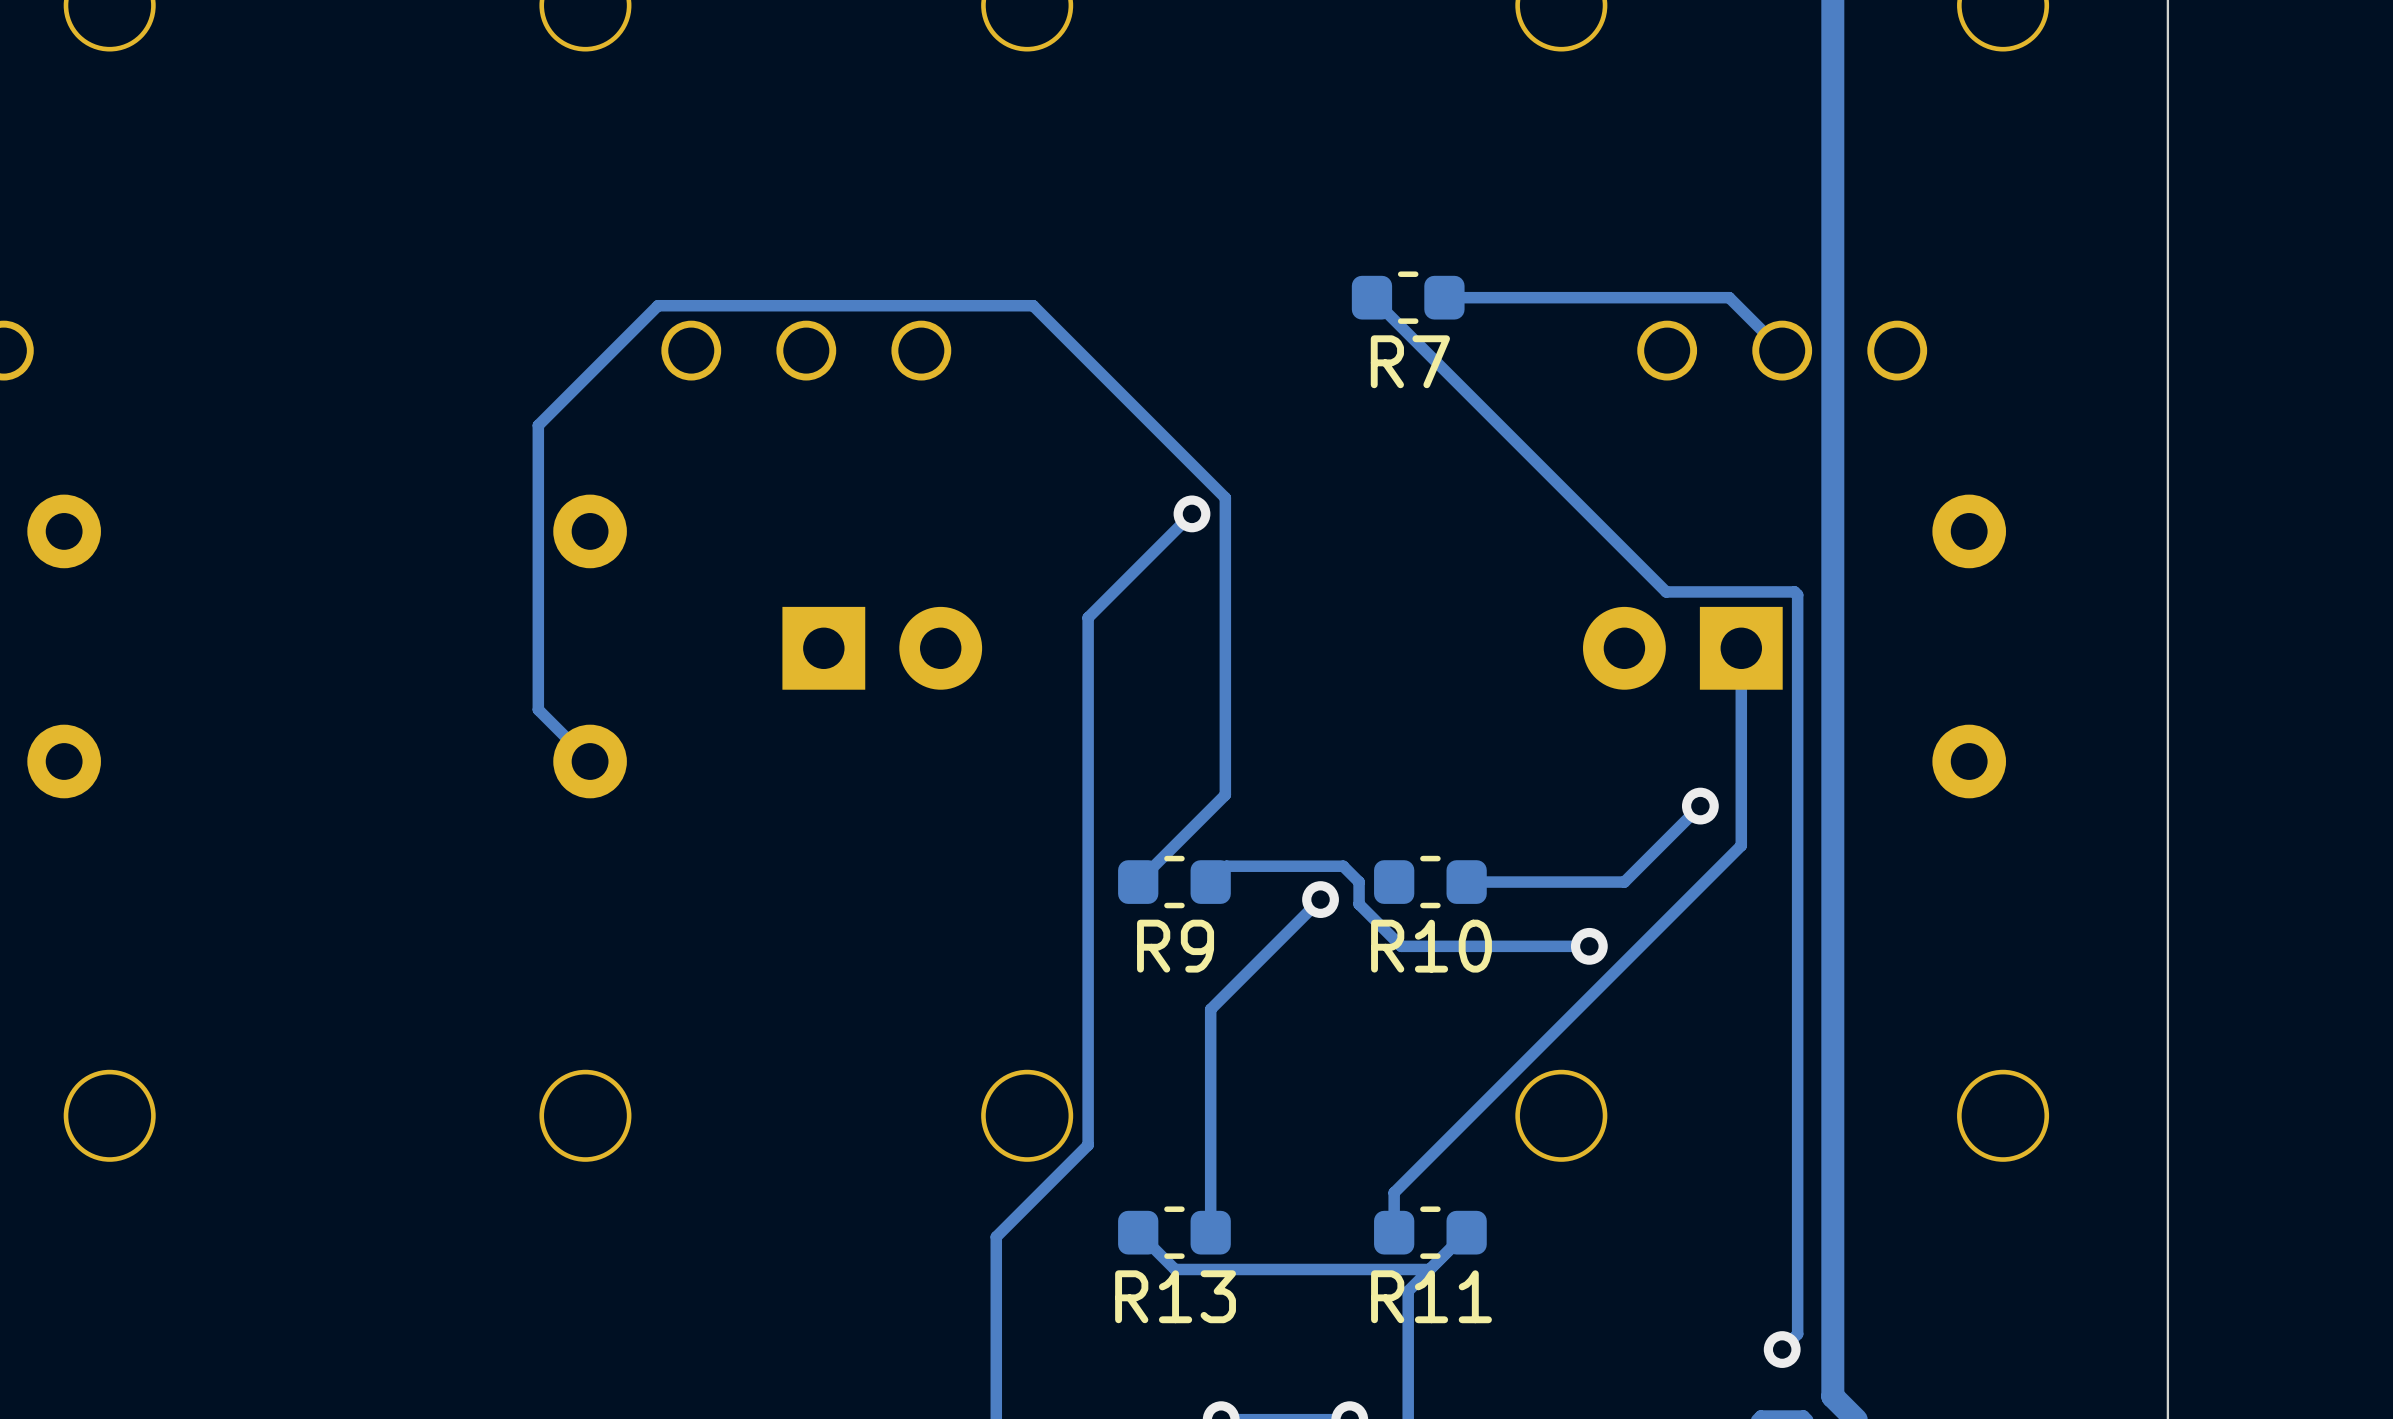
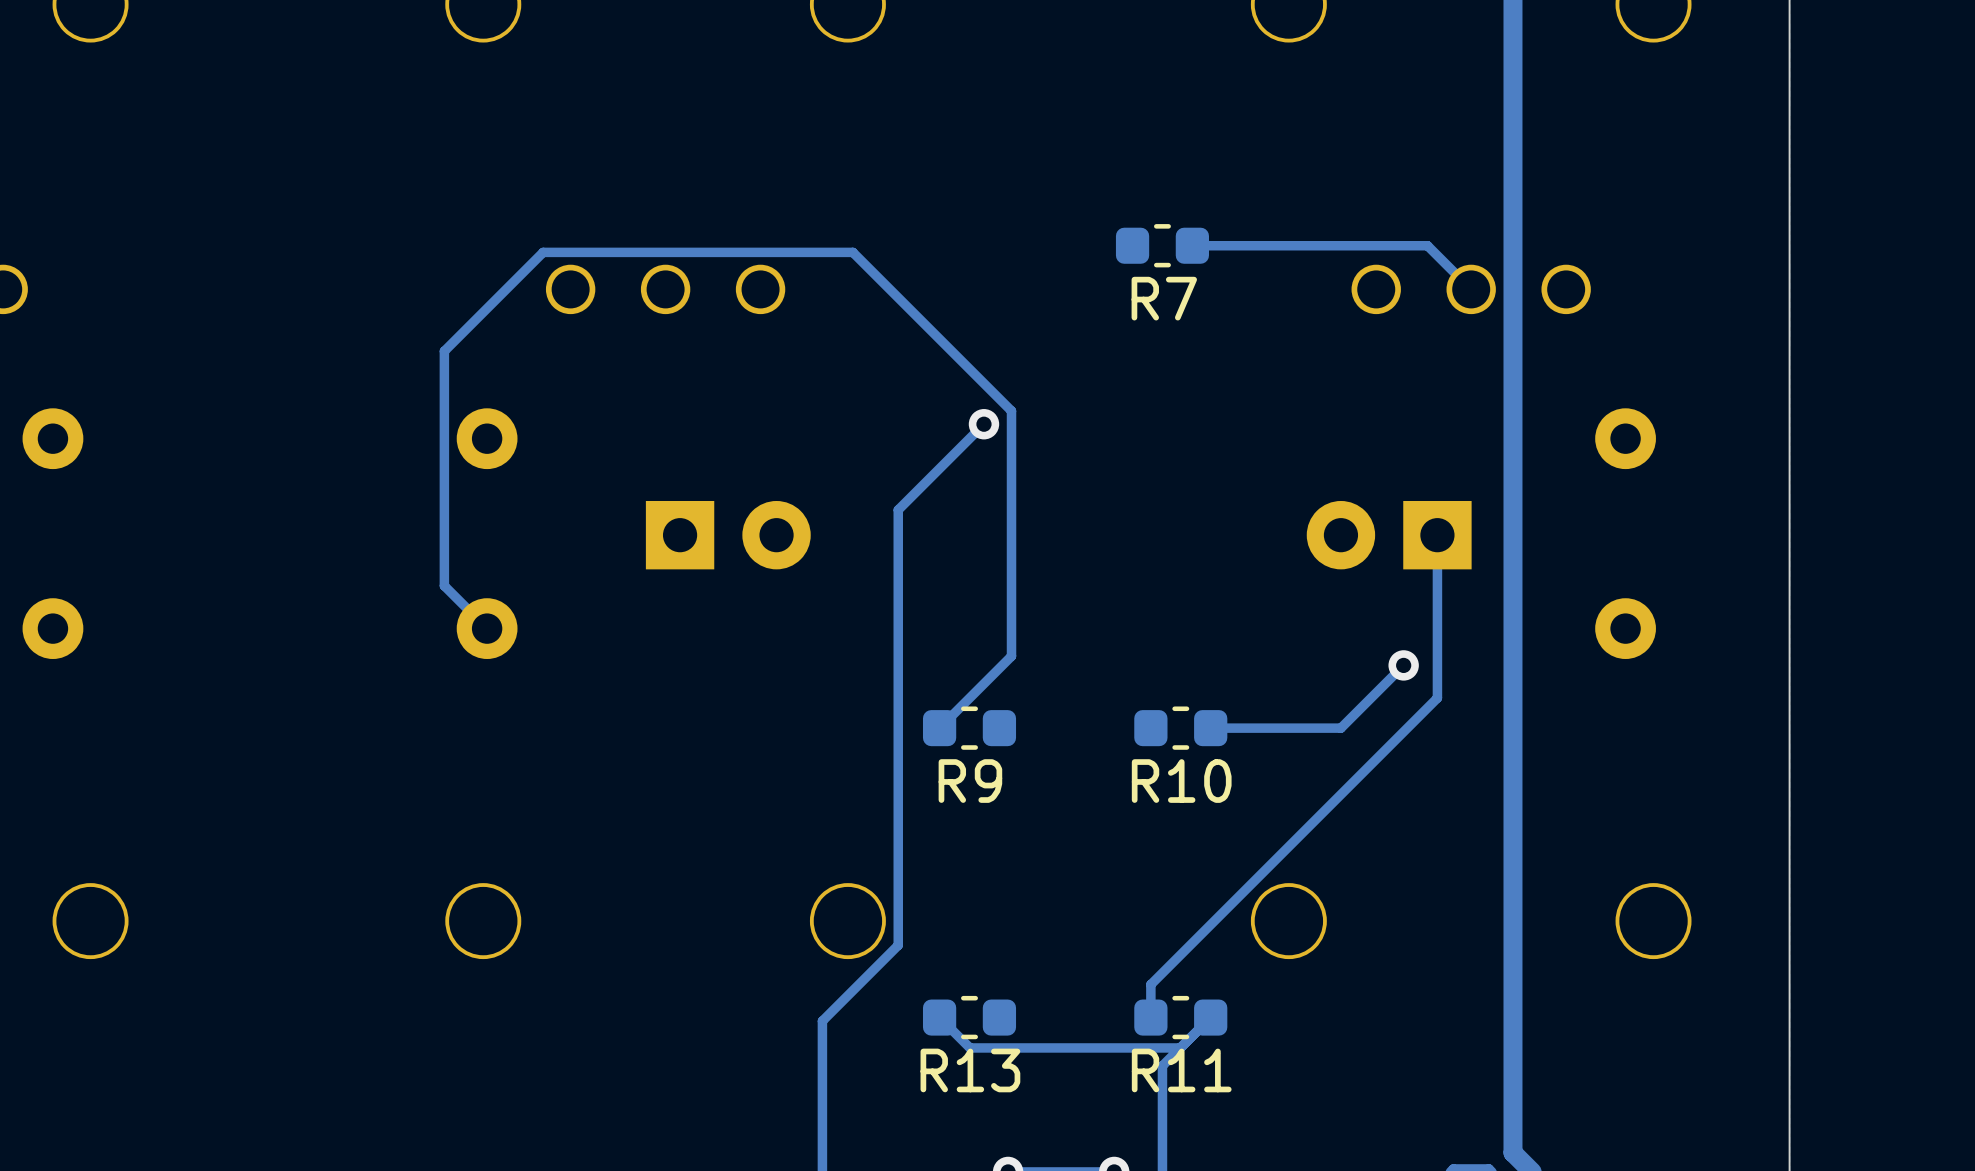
track: (1371, 297) (1666, 591) (1794, 591) (1797, 594) (1797, 1334) (1782, 1349) -> none
track: (1210, 882) (1226, 866) (1343, 866) (1359, 882) (1359, 904) (1401, 946) (1589, 946) -> none
track: (1320, 899) (1210, 1009) (1210, 1232) -> none
via: (1320, 899) -> none
via: (1589, 946) -> none
via: (1782, 1349) -> none

